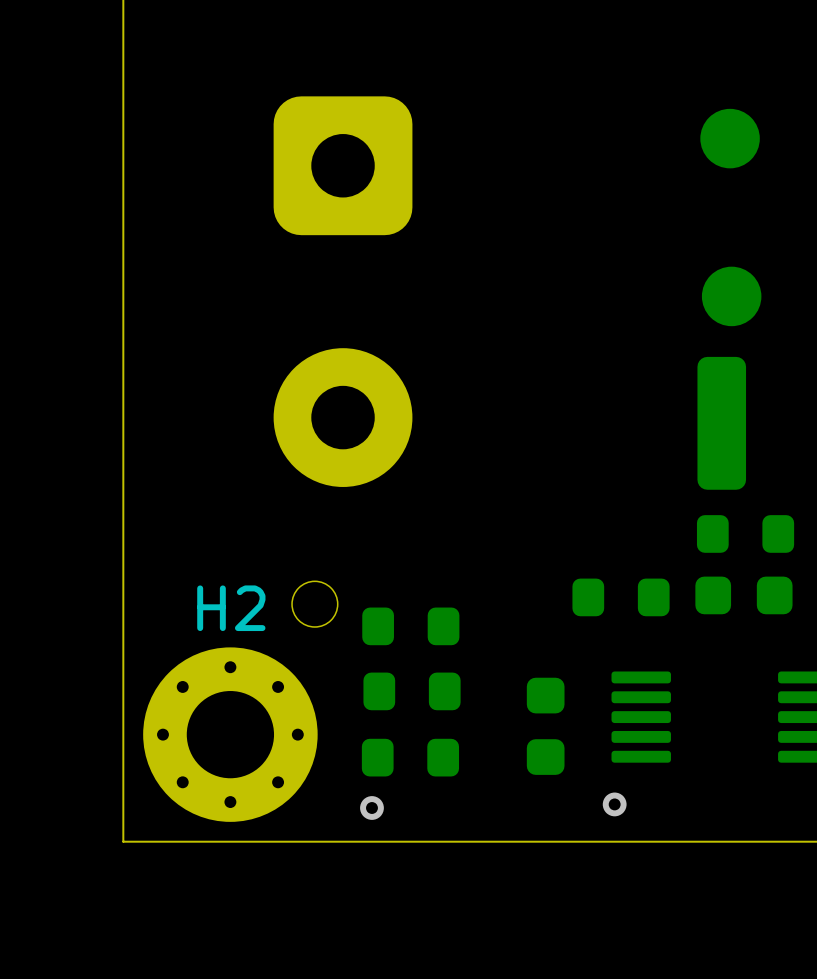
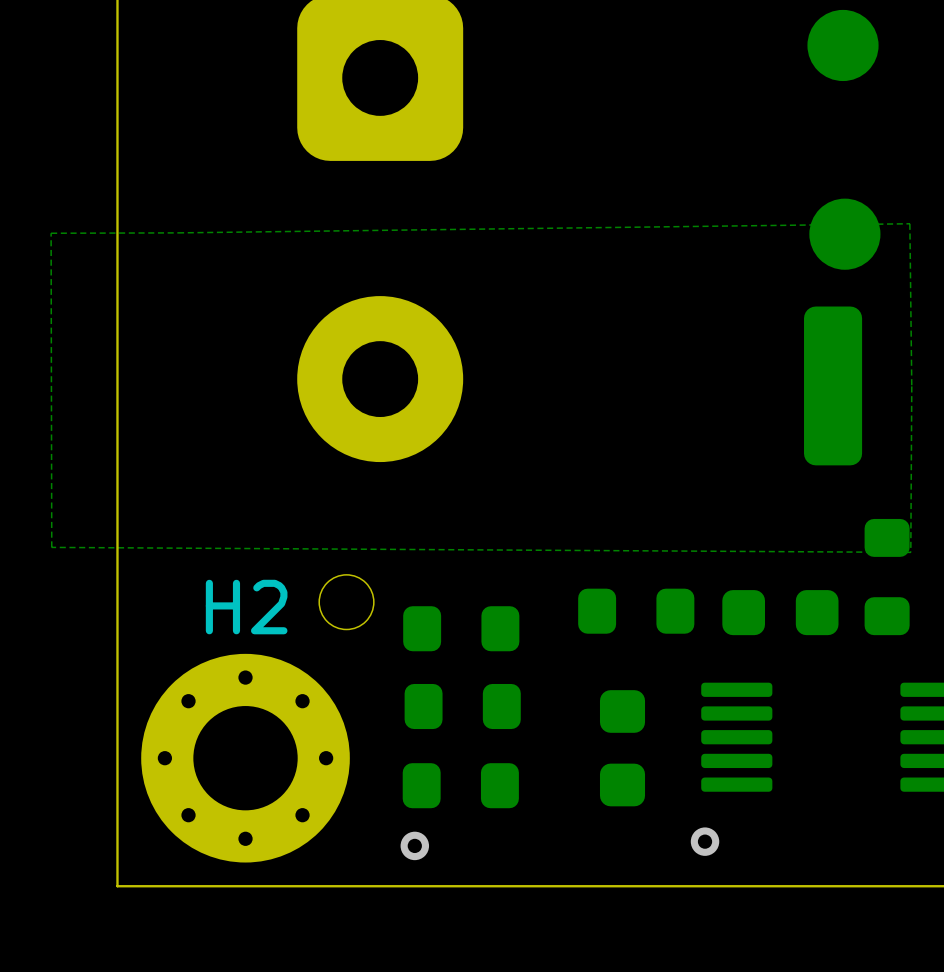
bottom zone outline: none -> (909, 223) (51, 233) (51, 547) (910, 552) (909, 223)
part: (745, 533) -> none
part footprint: [695, 576, 793, 615] -> [864, 518, 910, 636]
part position: (621, 597) -> (636, 611)
part: none -> (780, 612)

